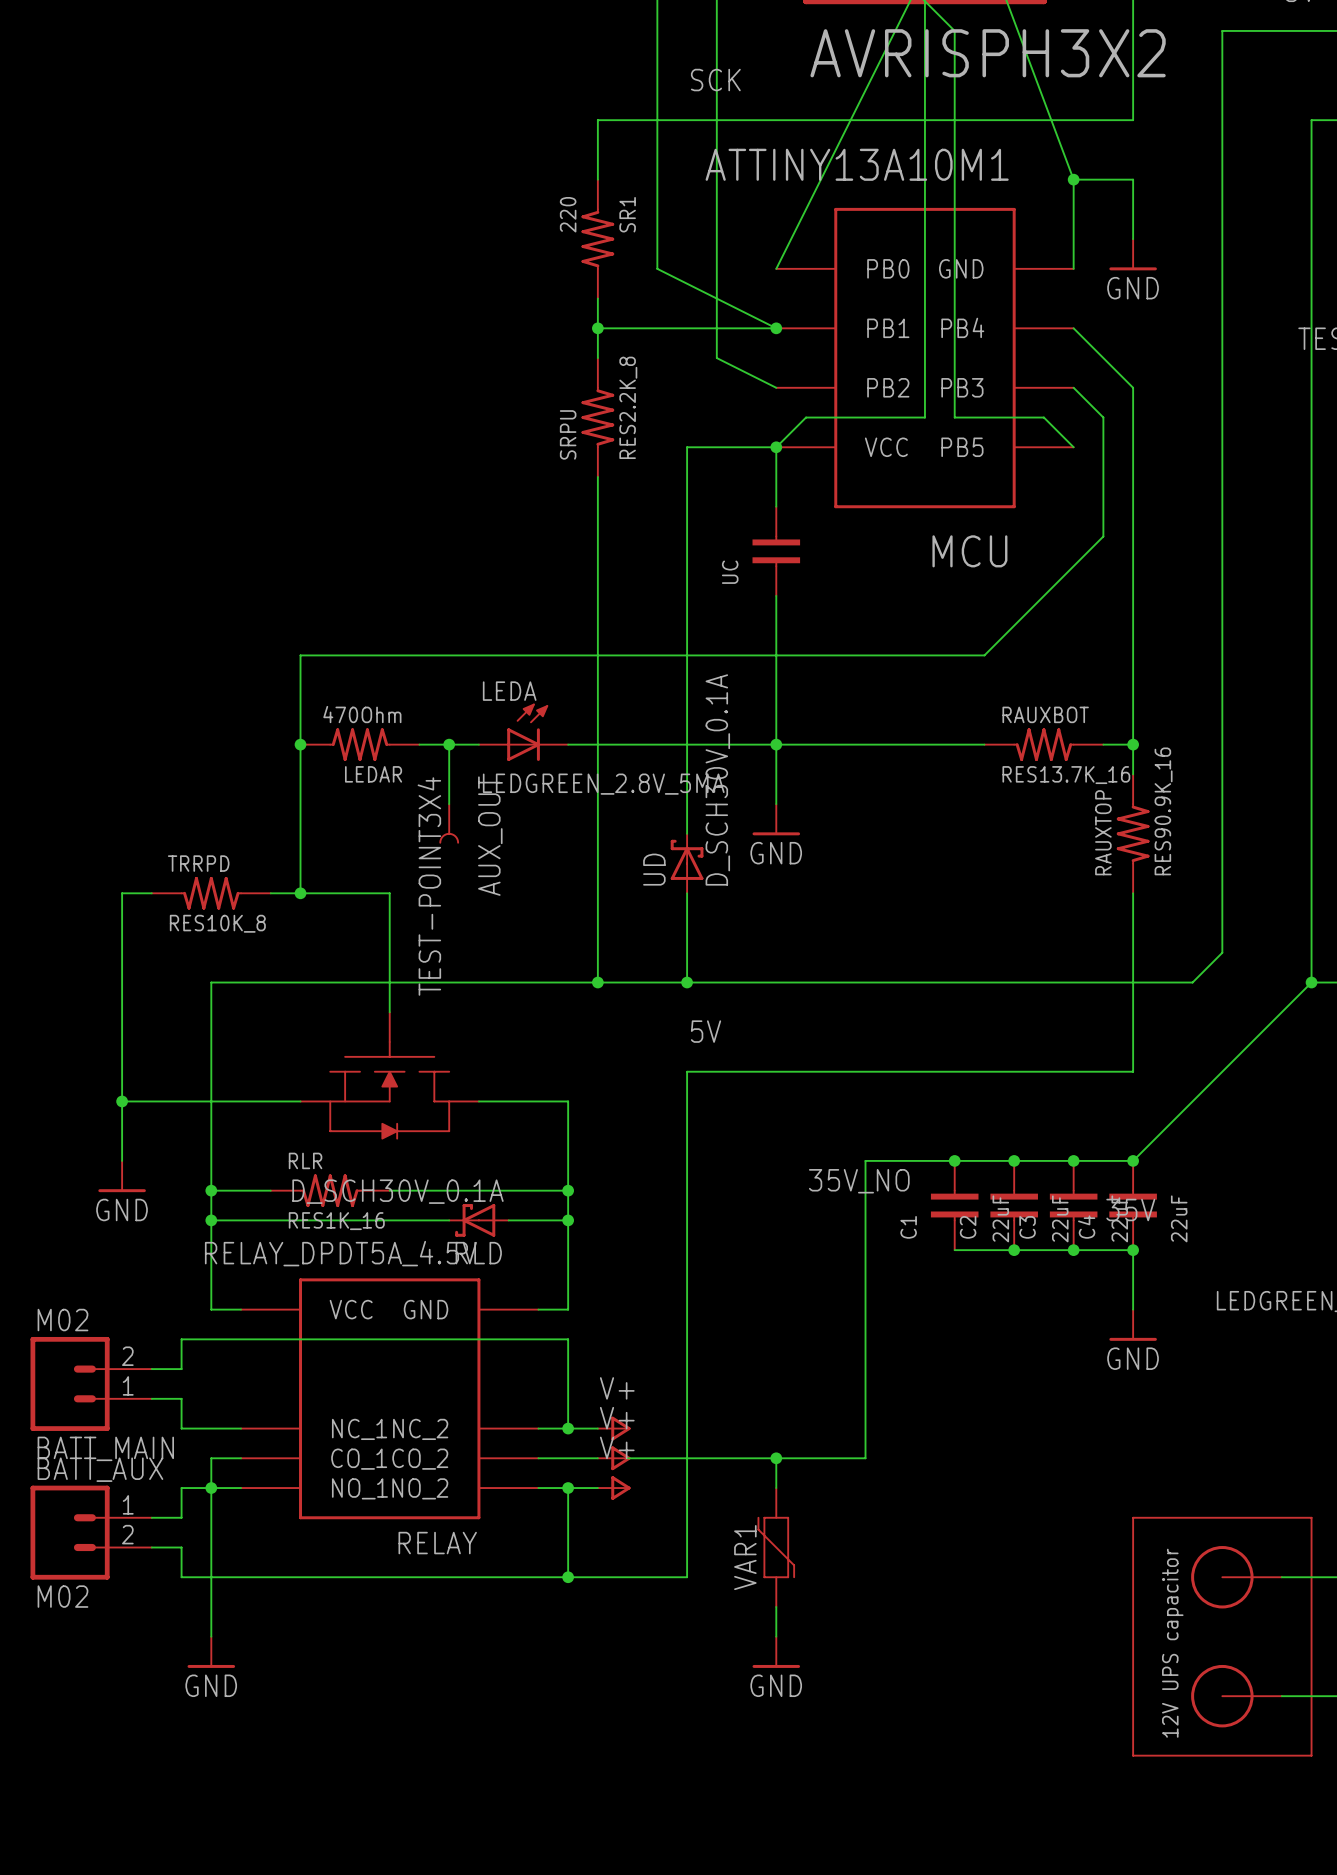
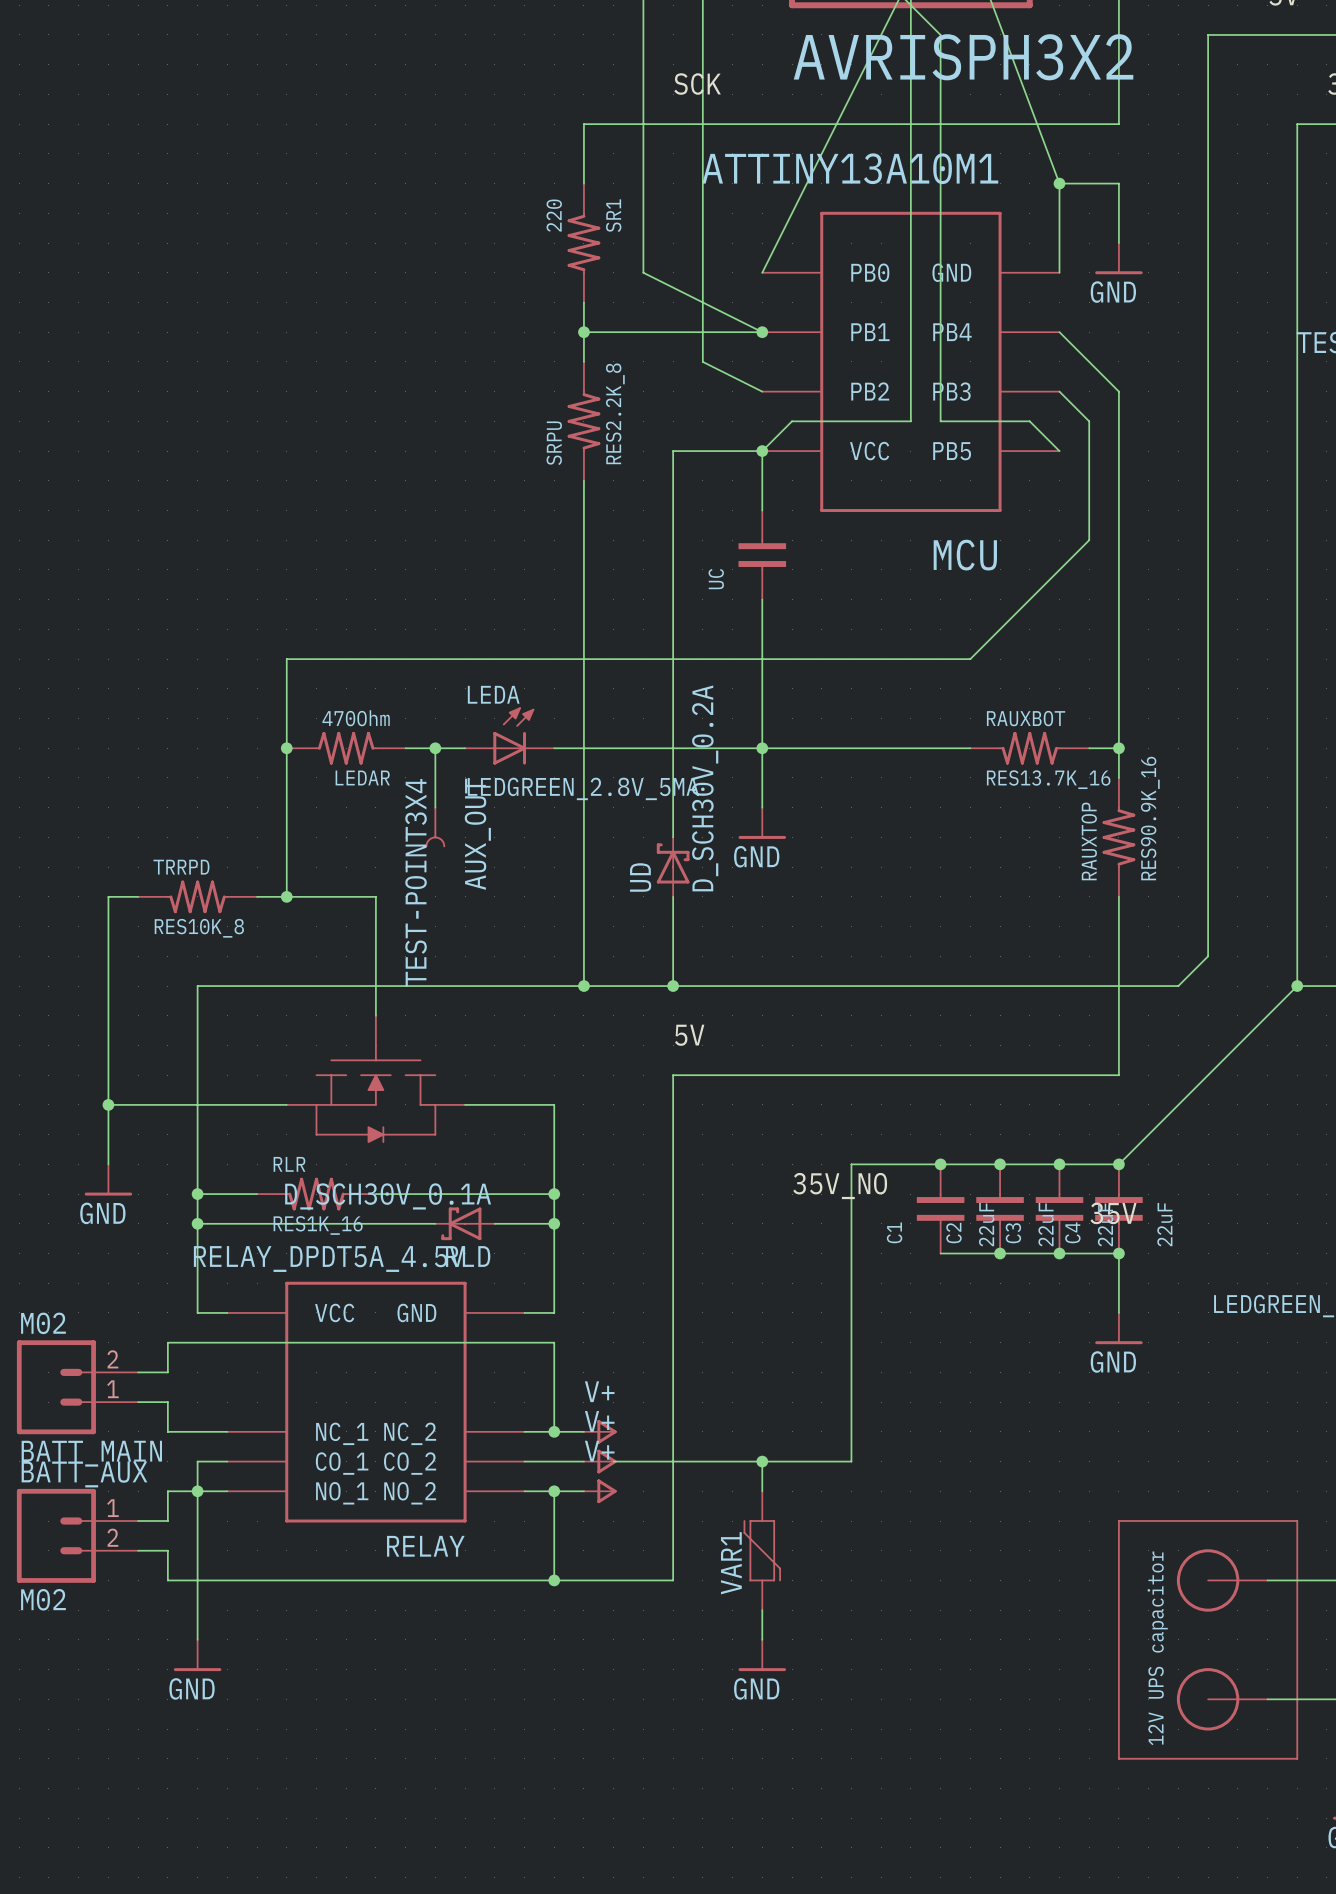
UD value: D_SCH30V_0.1A (717, 779) -> D_SCH30V_0.2A (705, 788)

